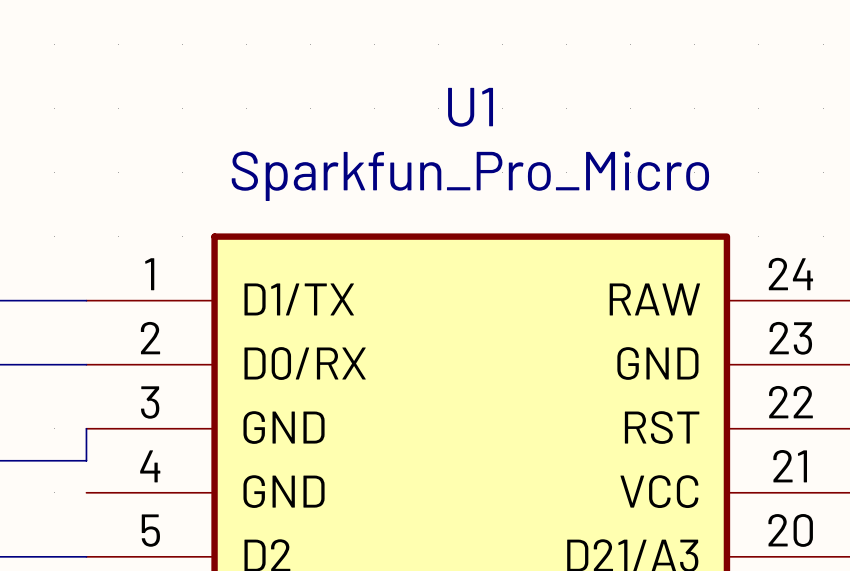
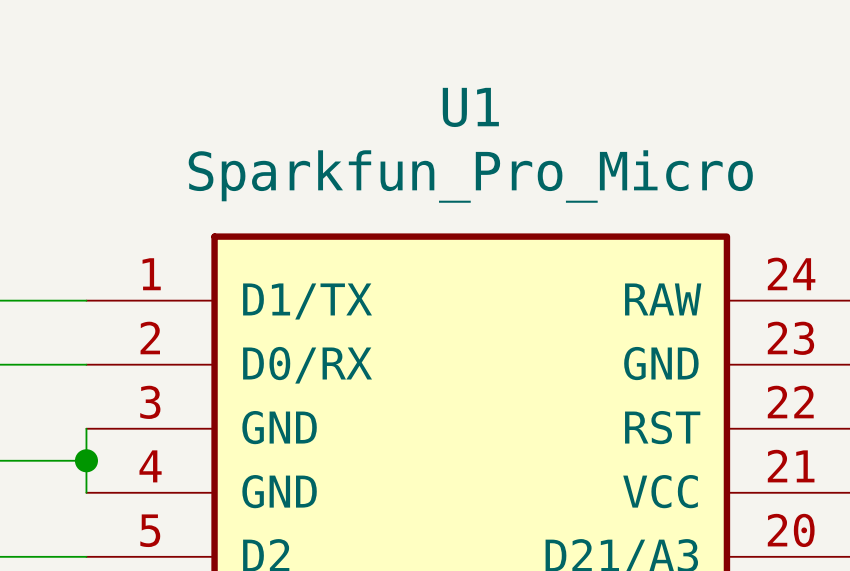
wire: none -> (86, 460) (86, 492)
junction: none -> (86, 460)

